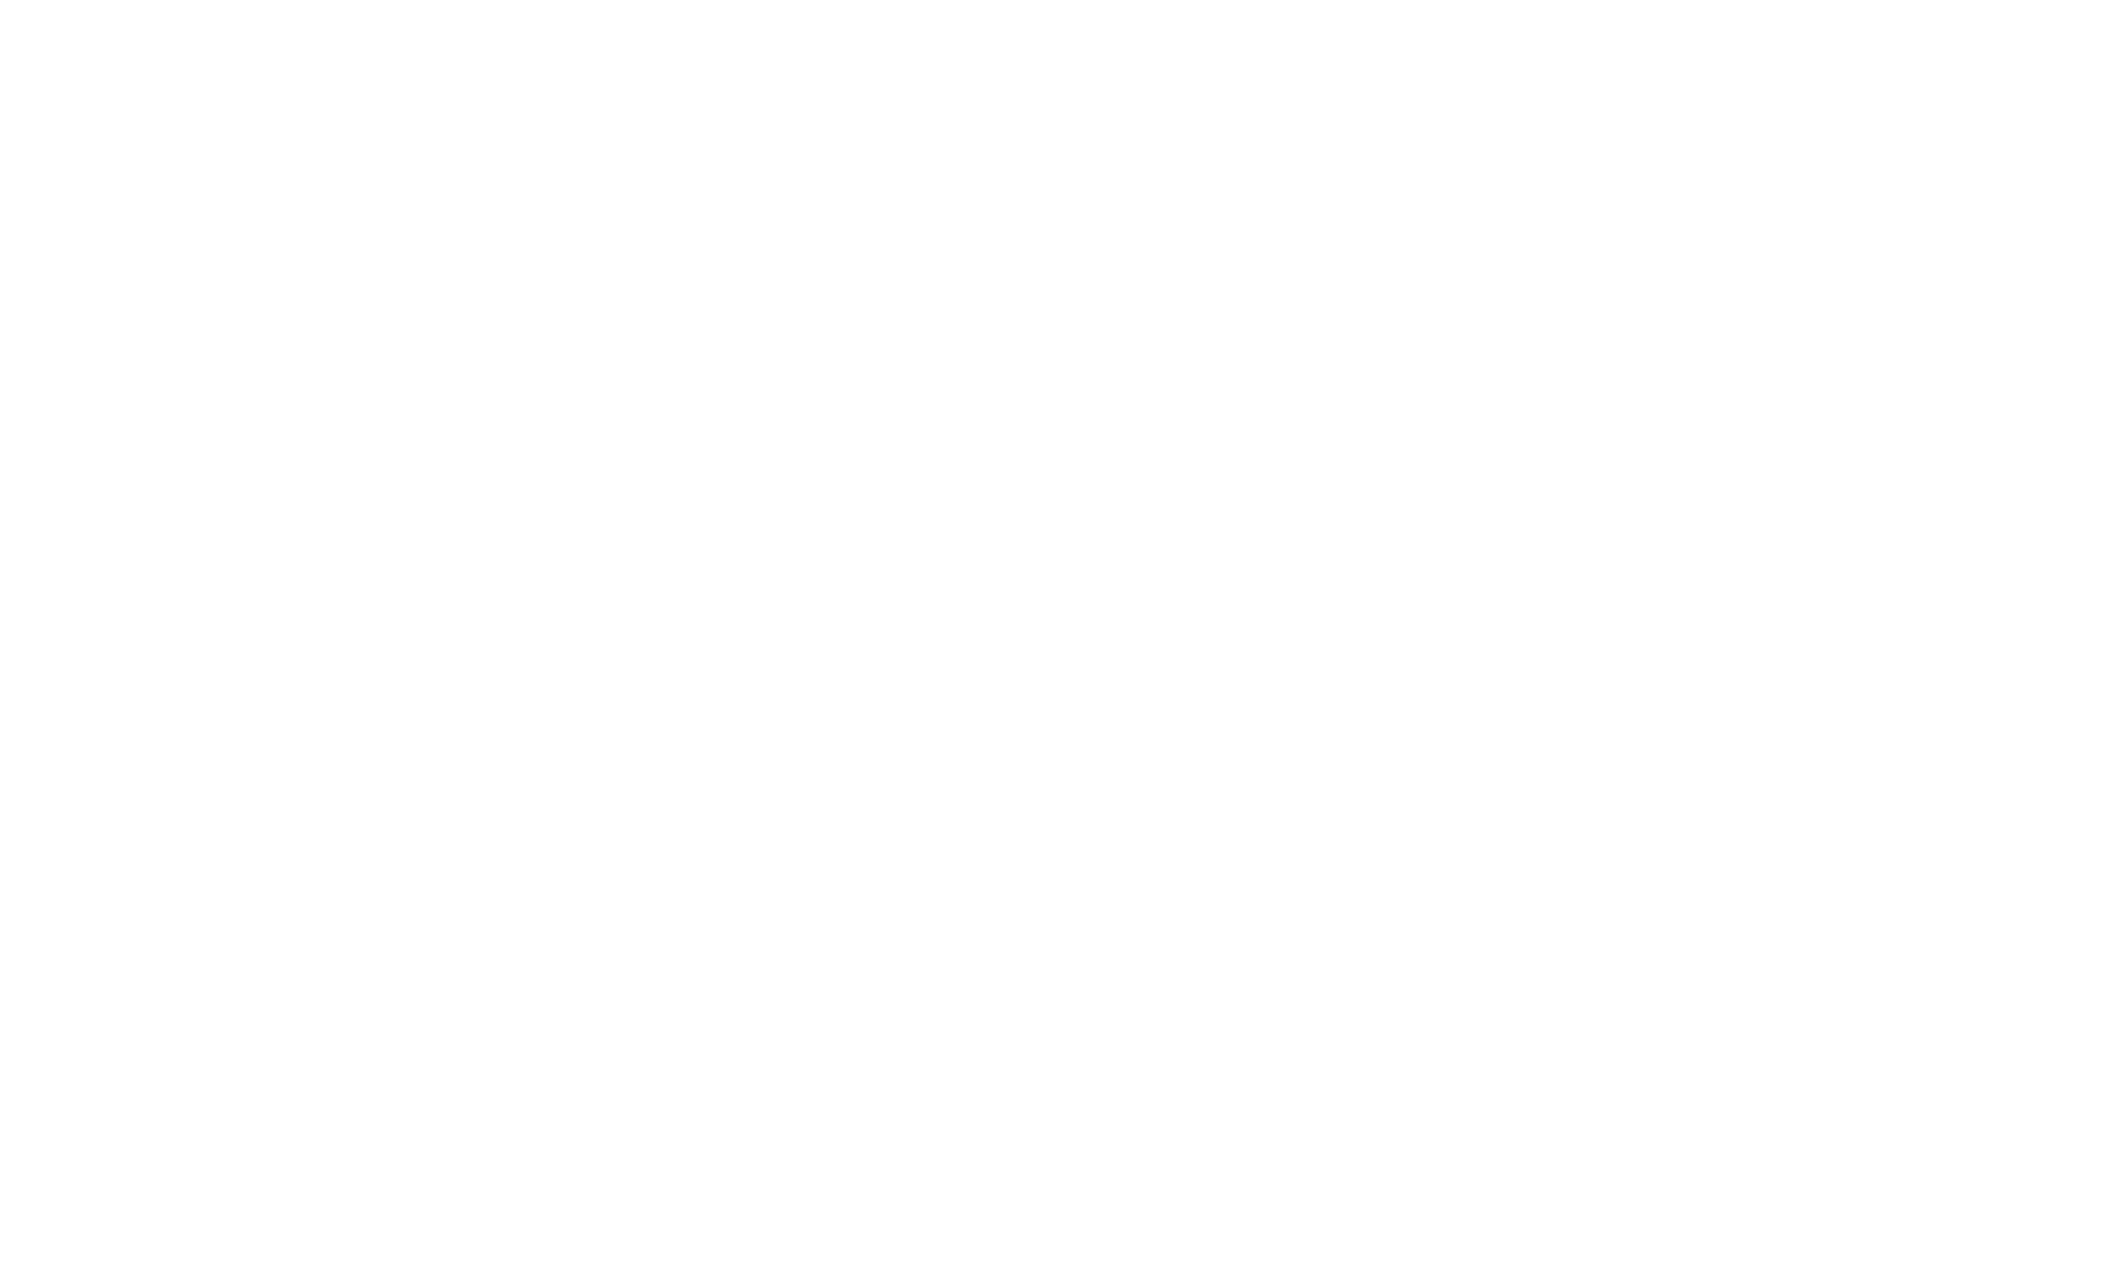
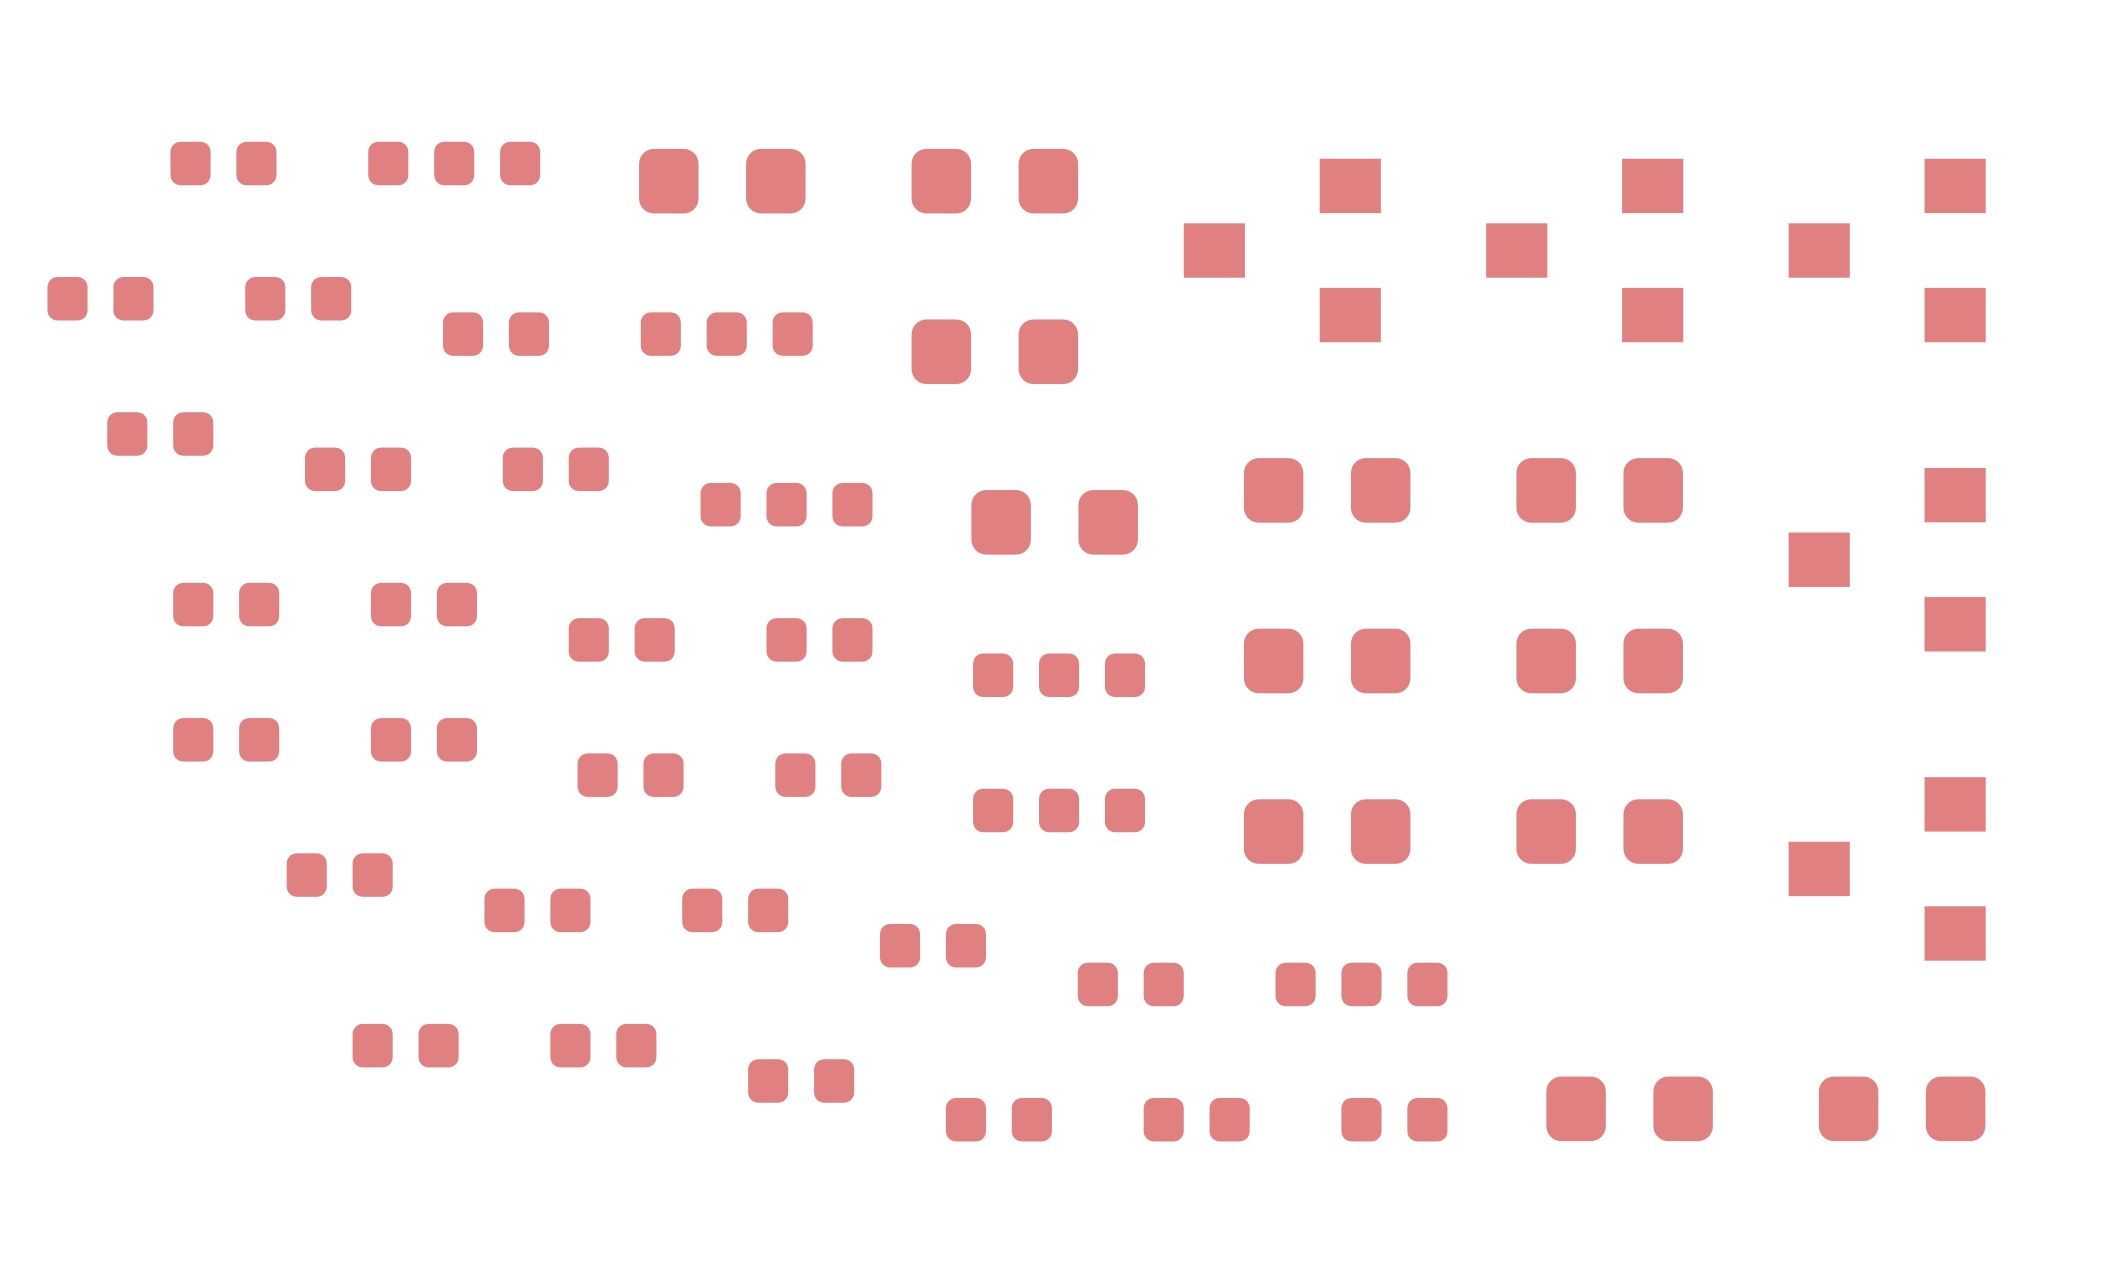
part: none -> (223, 163)
part: none -> (454, 163)
part: none -> (722, 181)
part: none -> (994, 181)
part: none -> (1282, 250)
part: none -> (1584, 250)
part: none -> (1887, 250)
part: none -> (100, 298)
part: none -> (298, 298)
part: none -> (496, 334)
part: none -> (726, 334)
part: none -> (994, 351)
part: none -> (160, 433)
part: none -> (358, 469)
part: none -> (555, 469)
part: none -> (1327, 490)
part: none -> (1599, 490)
part: none -> (786, 504)
part: none -> (1054, 522)
part: none -> (1887, 559)
part: none -> (226, 604)
part: none -> (423, 604)
part: none -> (621, 639)
part: none -> (819, 639)
part: none -> (1327, 660)
part: none -> (1599, 660)
part: none -> (1059, 675)
part: none -> (226, 739)
part: none -> (423, 739)
part: none -> (630, 775)
part: none -> (828, 775)
part: none -> (1059, 810)
part: none -> (1327, 831)
part: none -> (1599, 831)
part: none -> (1887, 868)
part: none -> (339, 875)
part: none -> (537, 910)
part: none -> (735, 910)
part: none -> (932, 945)
part: none -> (1130, 984)
part: none -> (1361, 984)
part: none -> (405, 1045)
part: none -> (603, 1045)
part: none -> (801, 1080)
part: none -> (1629, 1108)
part: none -> (1902, 1108)
part: none -> (998, 1119)
part: none -> (1196, 1119)
part: none -> (1394, 1119)

